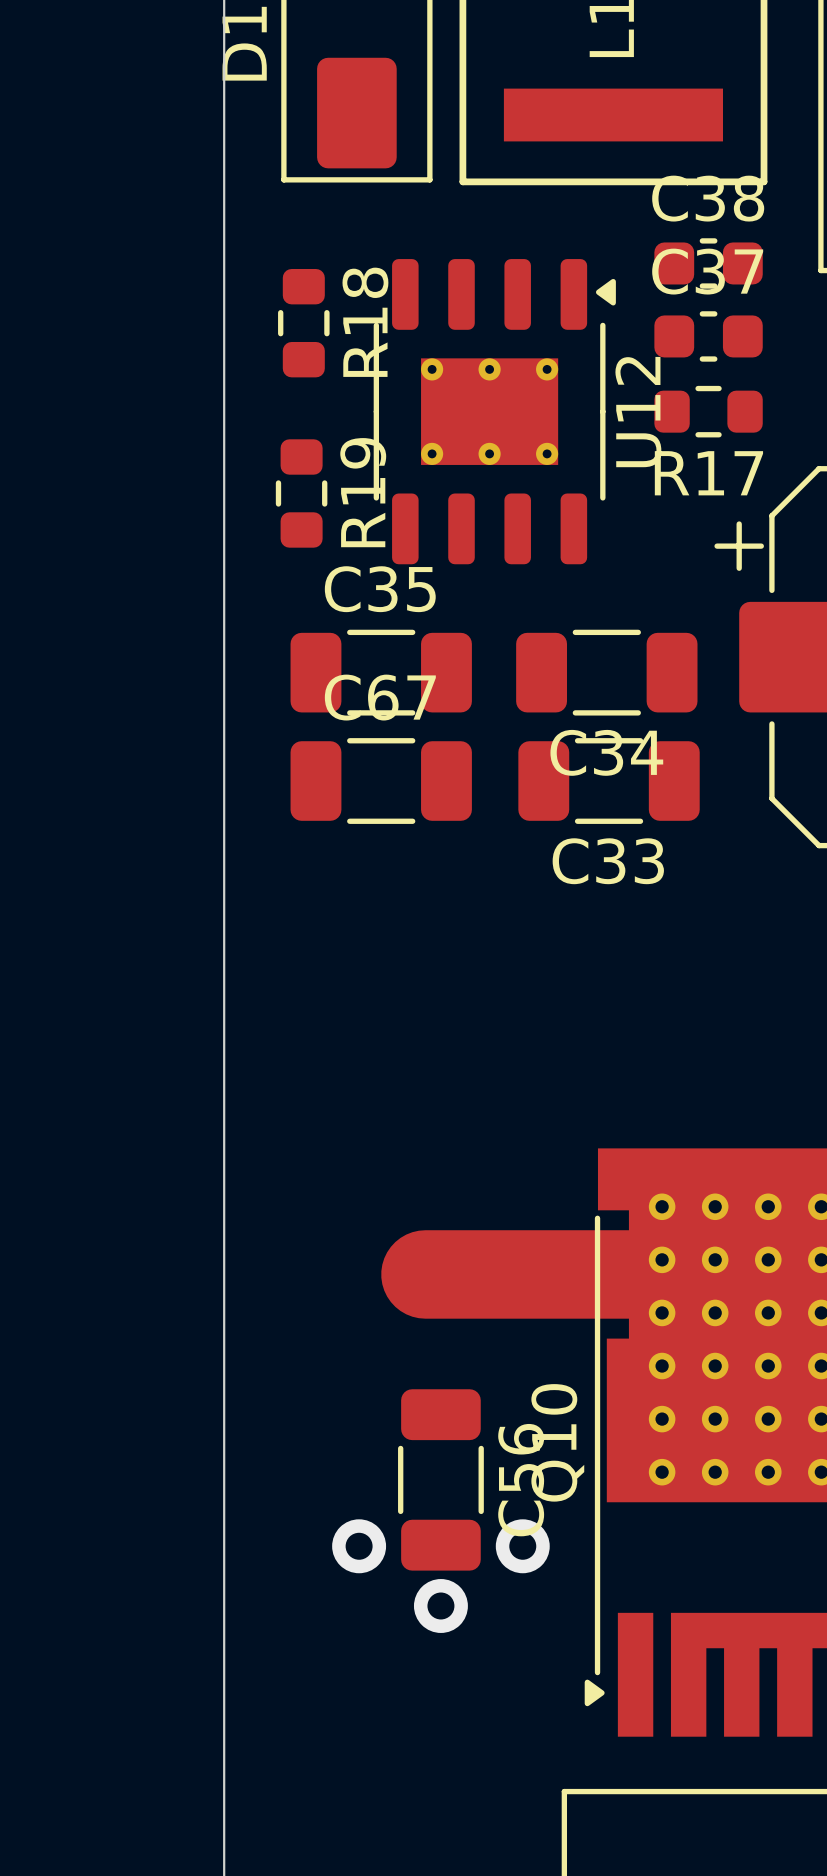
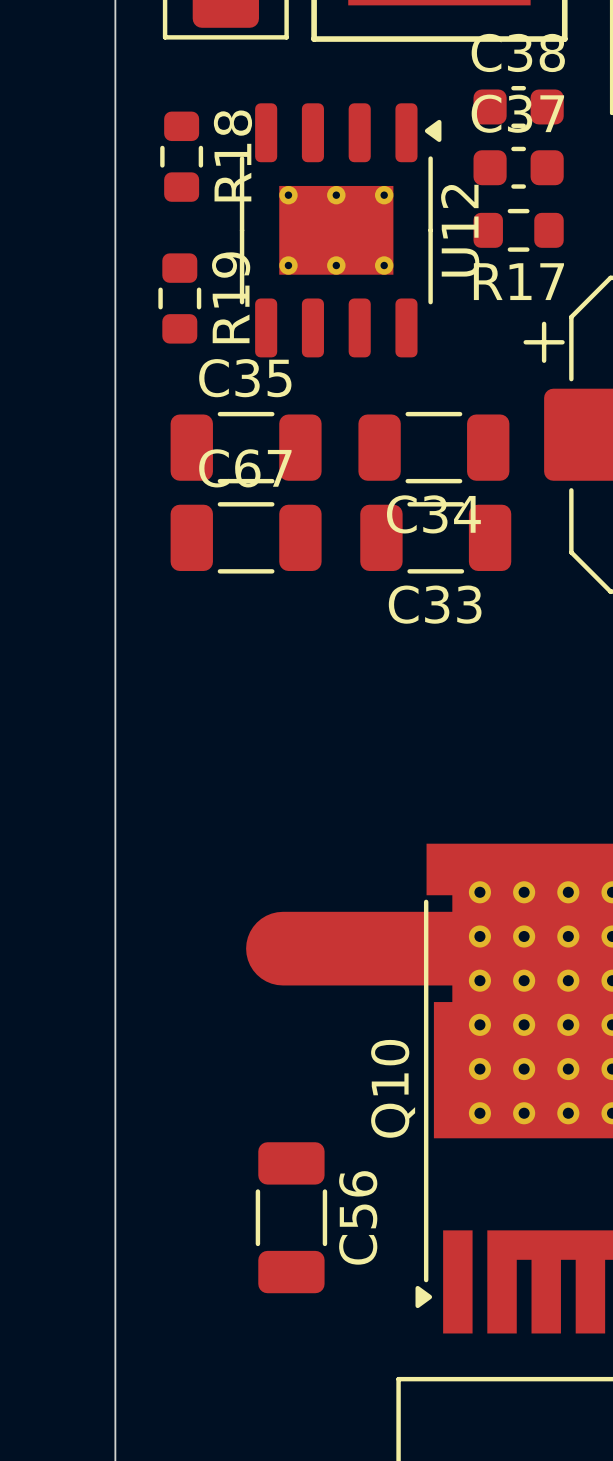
C56 position: (440, 1479) -> (291, 1217)
via: (359, 1546) -> none
via: (522, 1546) -> none
via: (440, 1605) -> none

